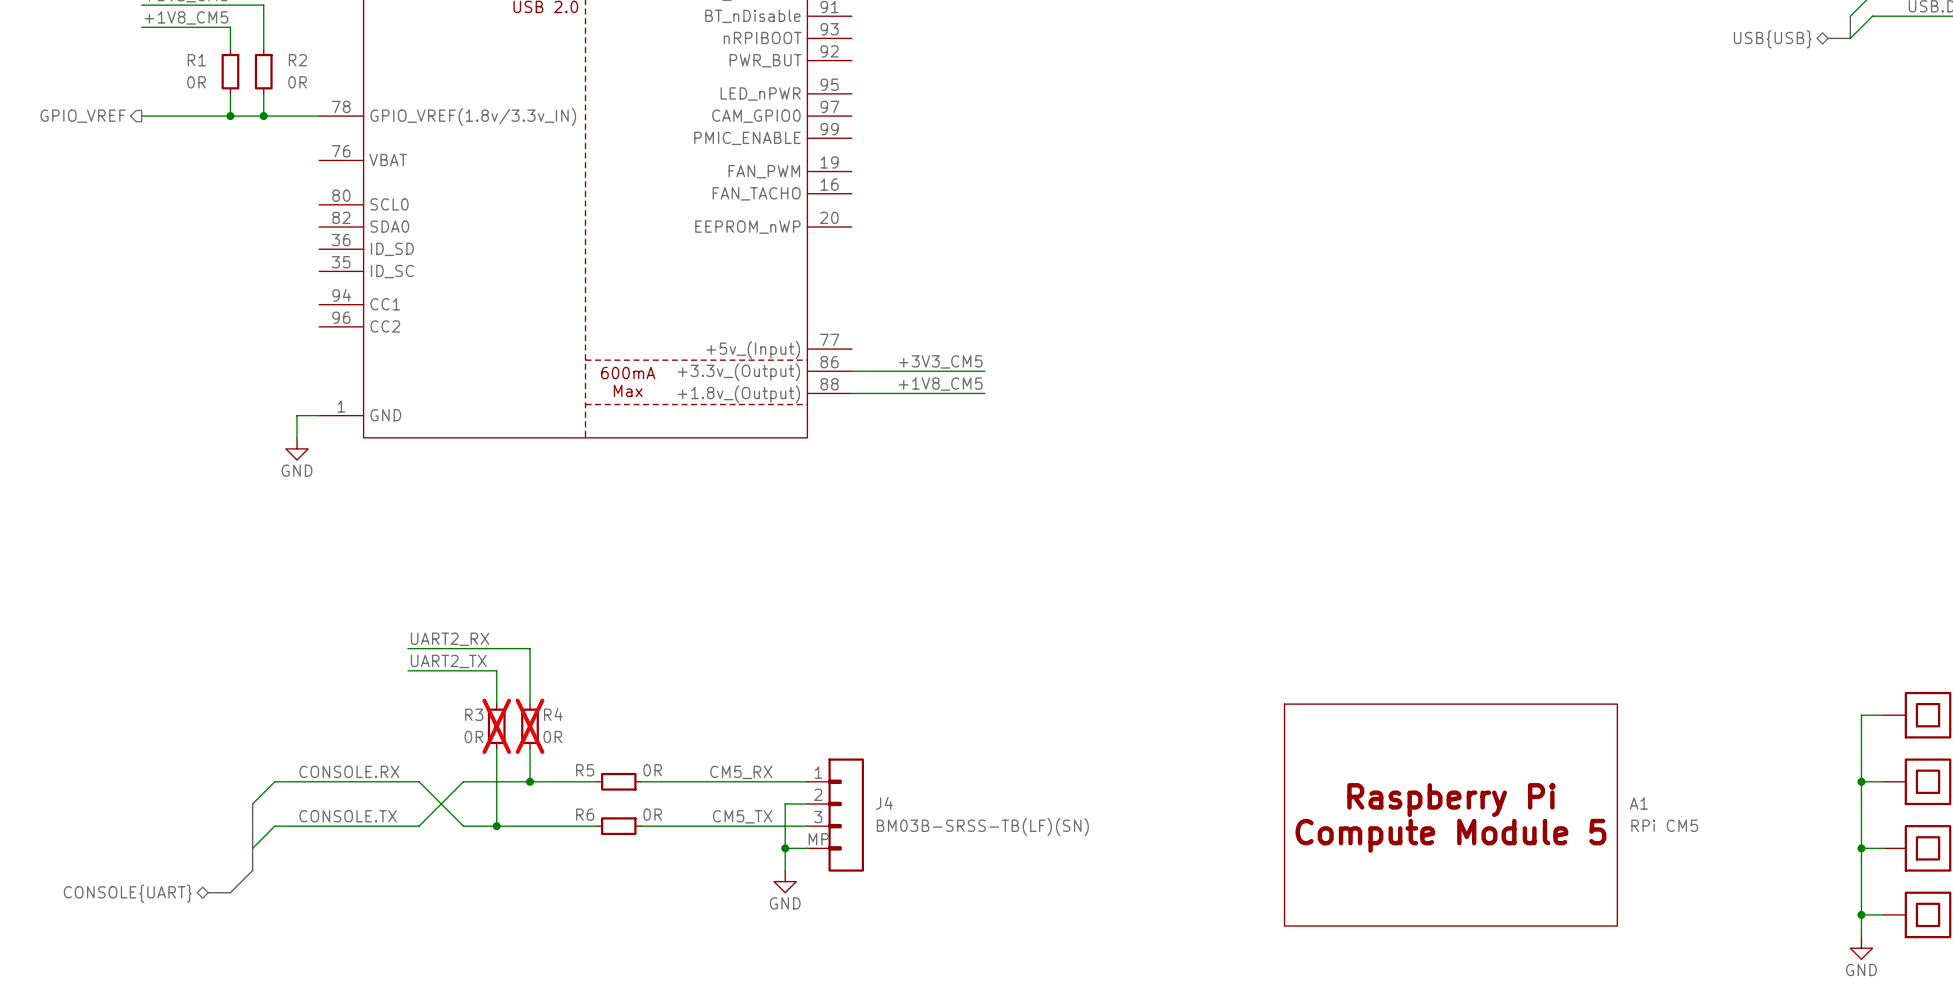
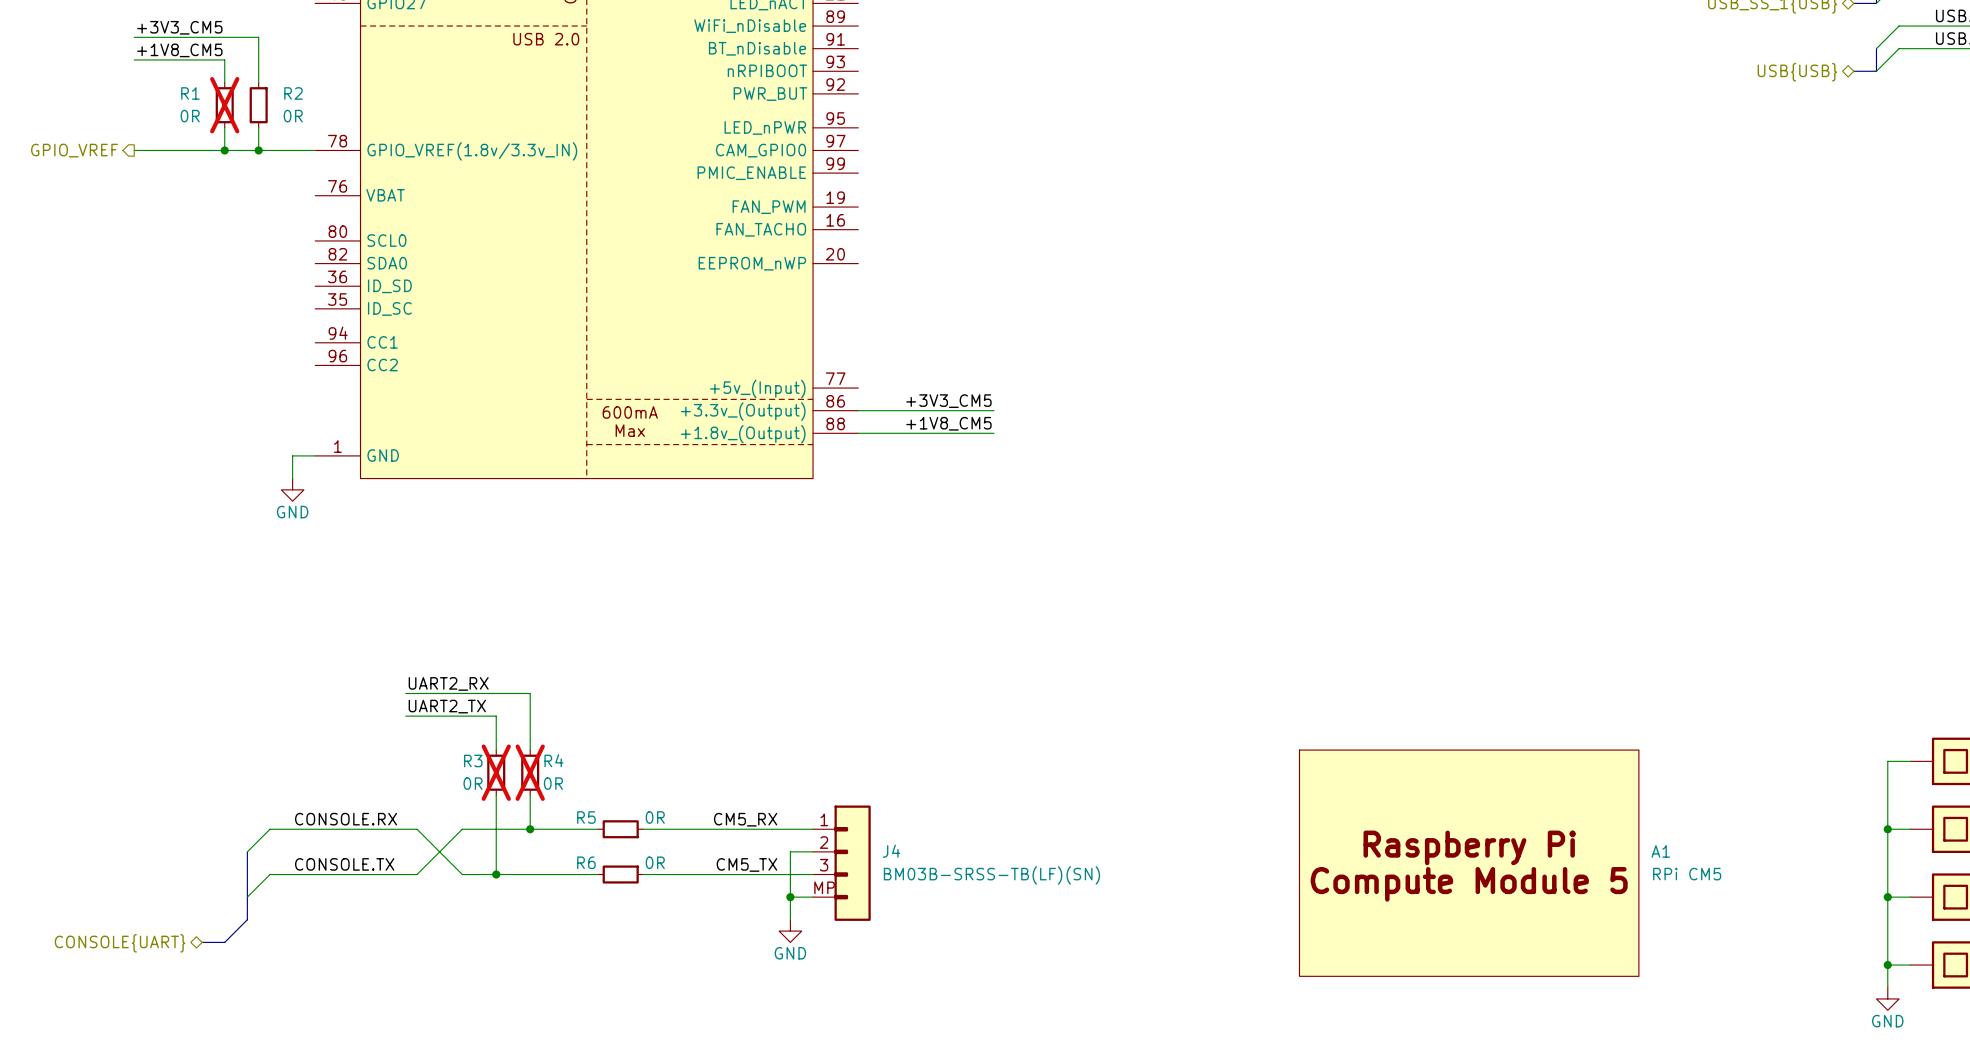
R1 do-not-place cross: none -> (224, 105)

